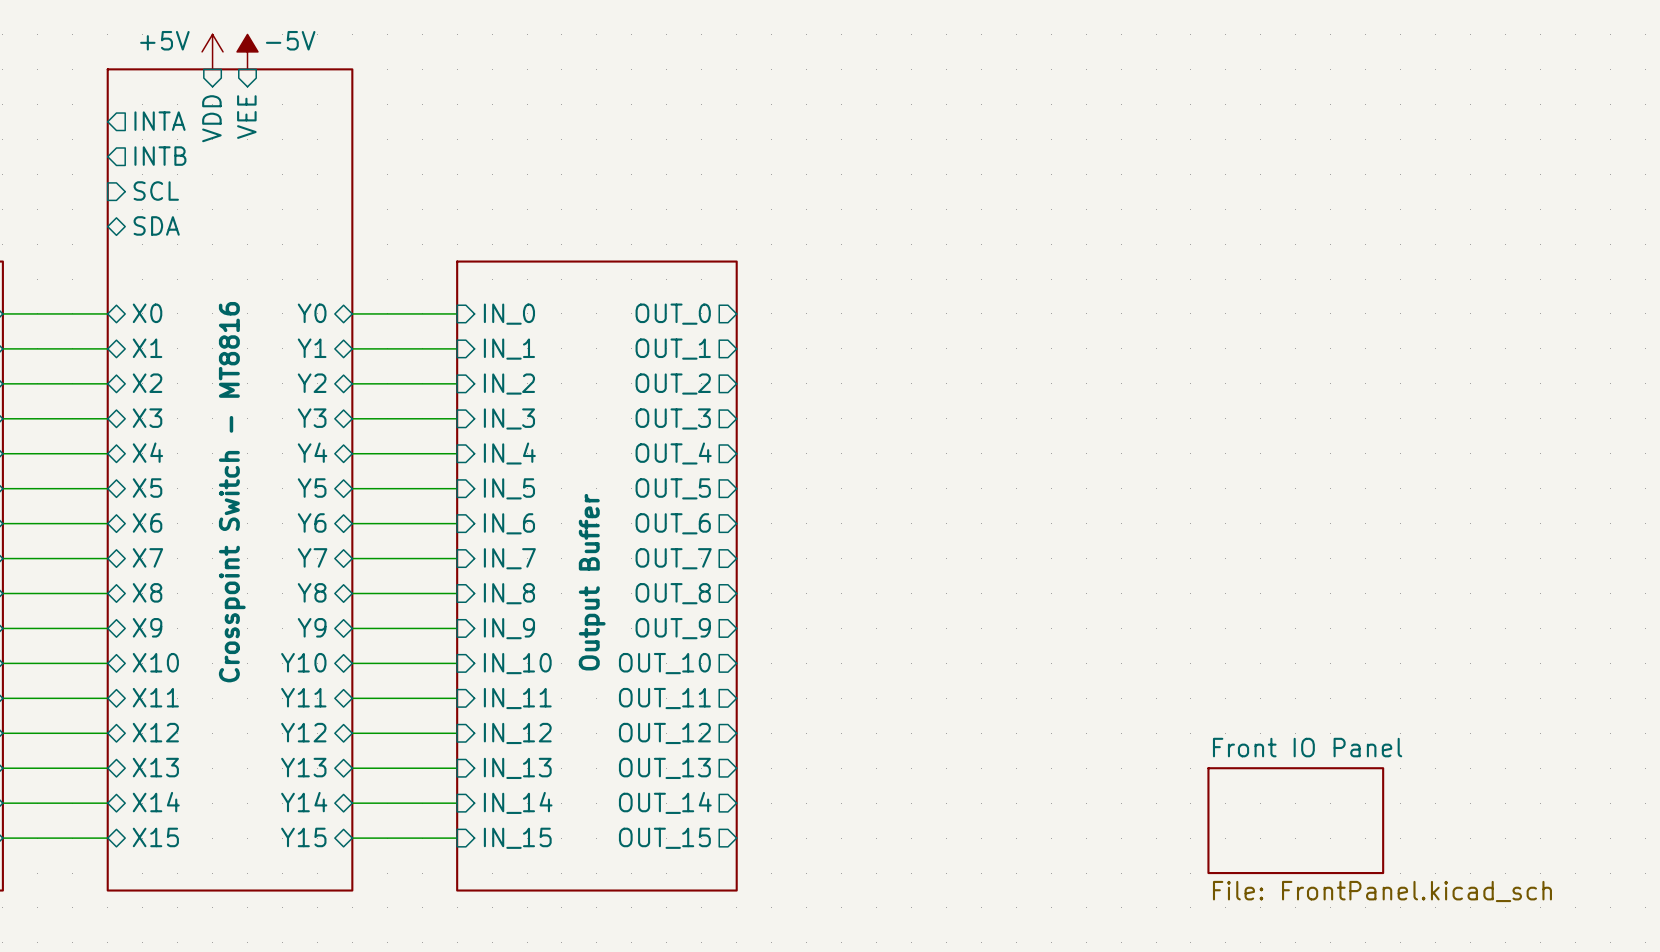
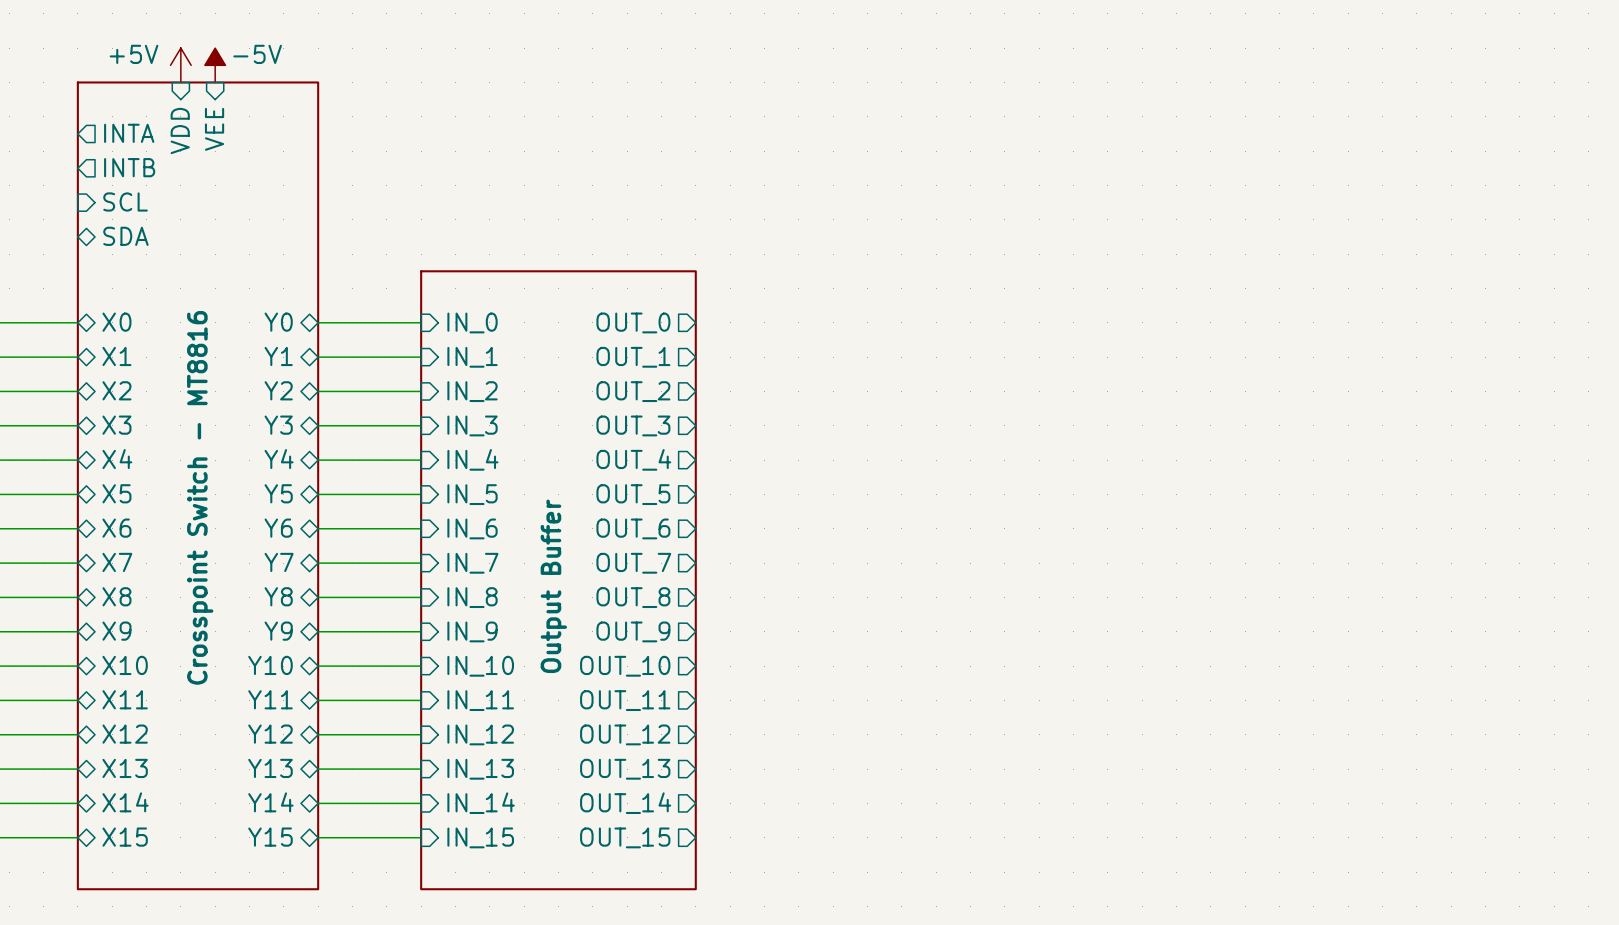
sheet Front IO Panel: File: FrontPanel.kicad_sch (1295, 820) -> none

